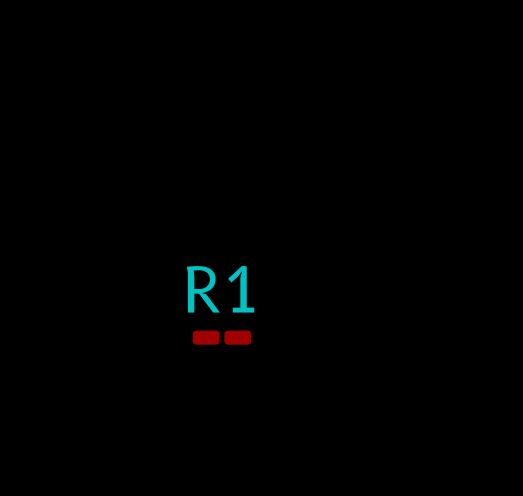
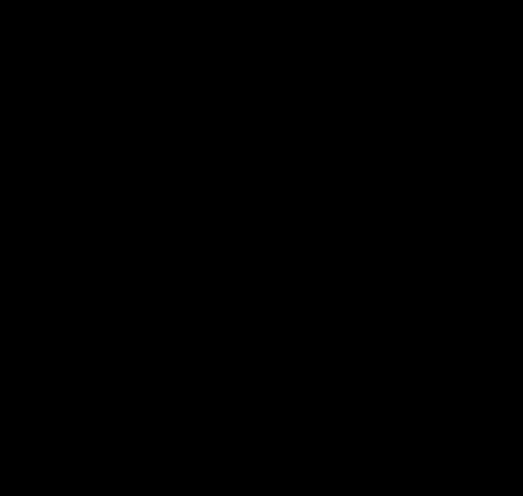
R1: (222, 337) -> none

